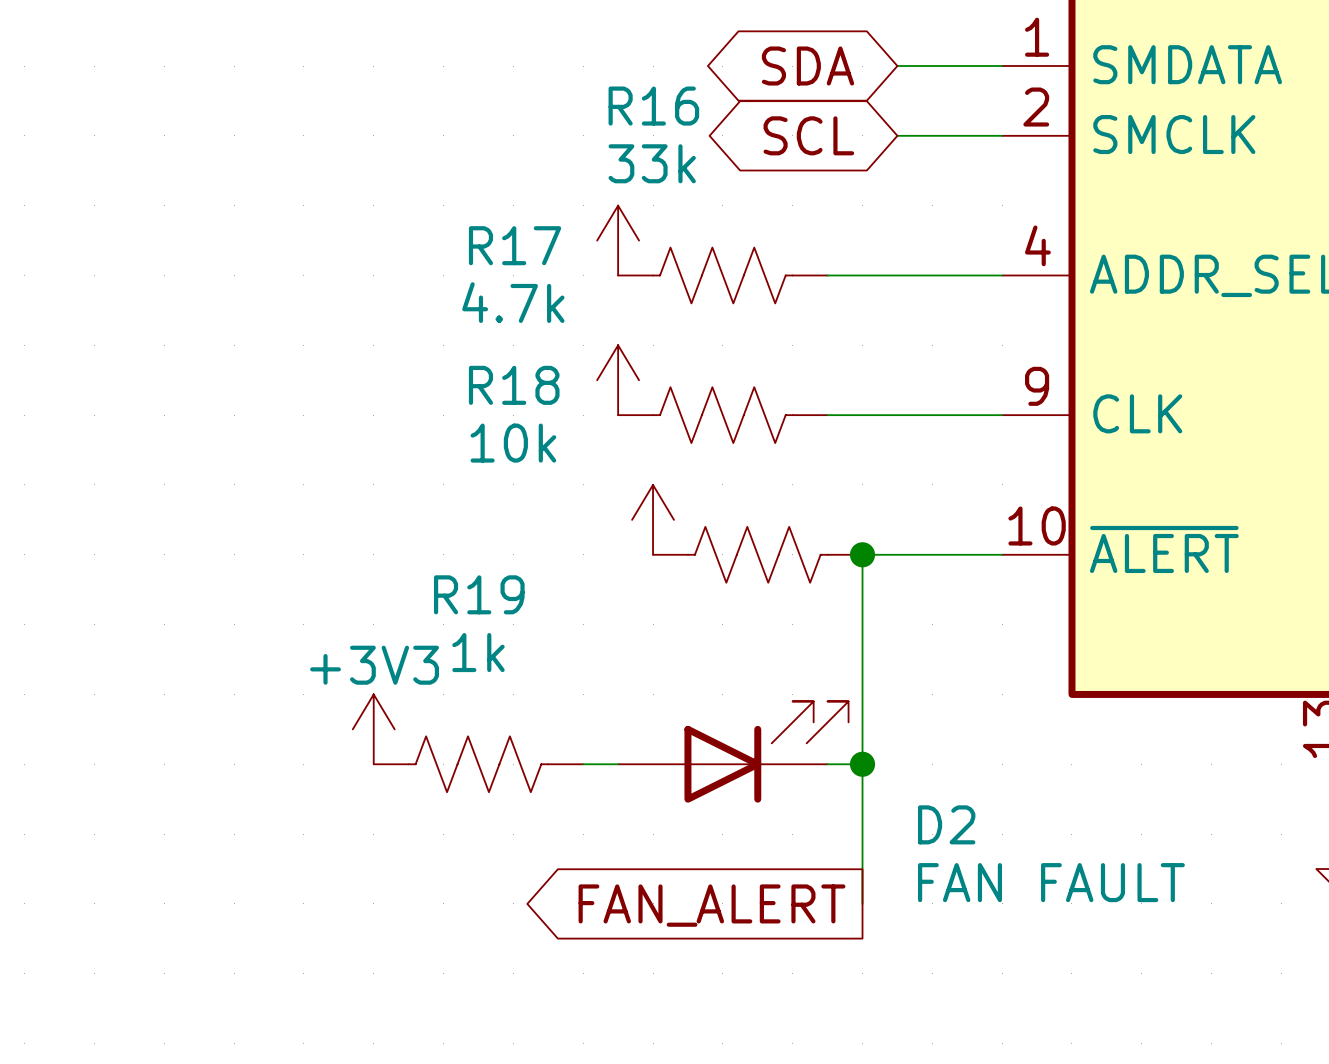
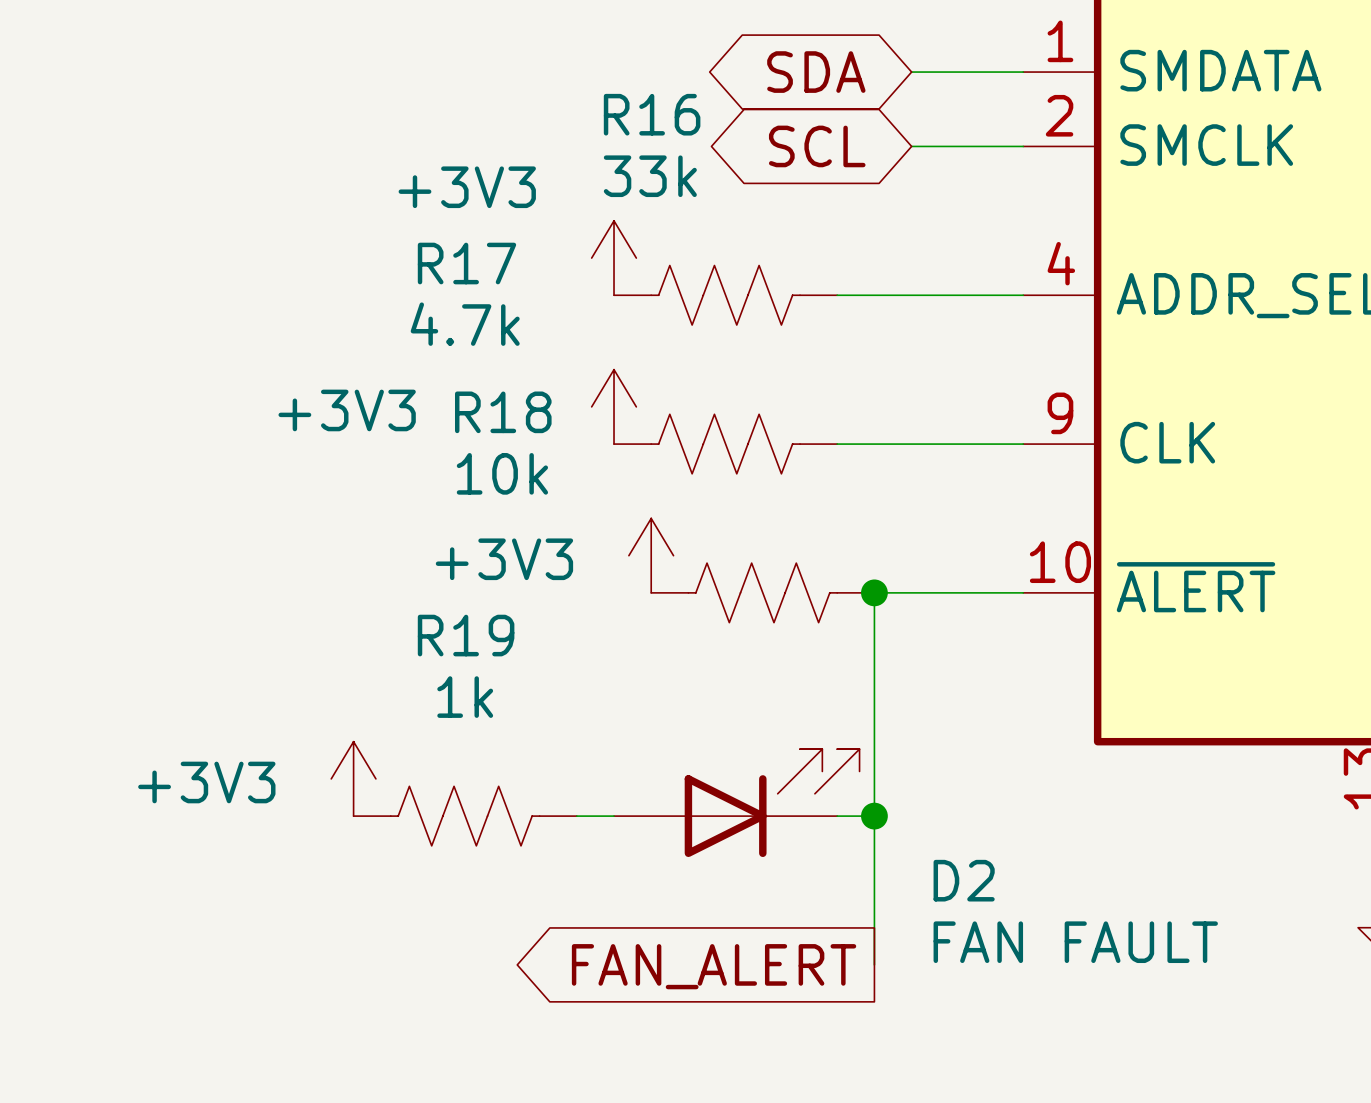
power symbol text: none -> +3V3 (467, 187)
R17 name position: R17 (515, 245) -> R17 (466, 263)
R17 value position: 4.7k (513, 302) -> 4.7k (465, 324)
power symbol text: none -> +3V3 (347, 410)
power symbol text: none -> +3V3 (504, 559)
power symbol text position: +3V3 (374, 665) -> +3V3 (206, 782)

